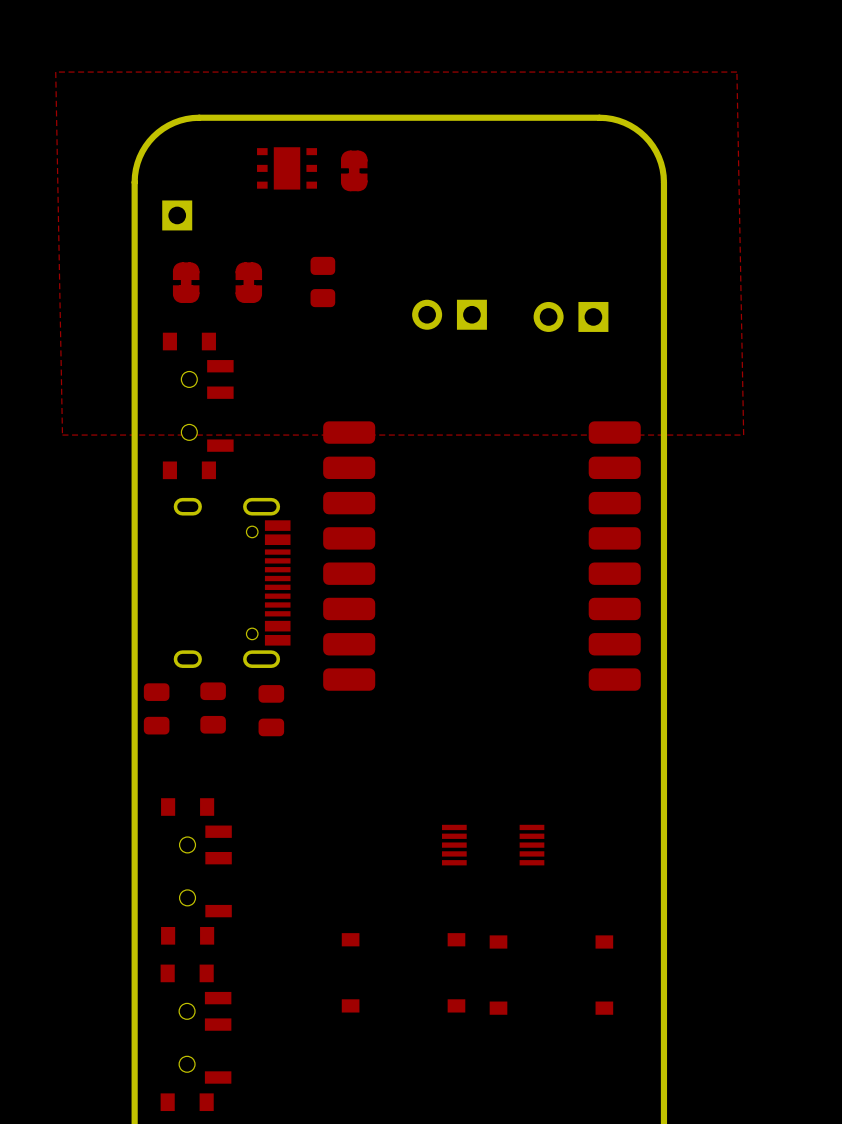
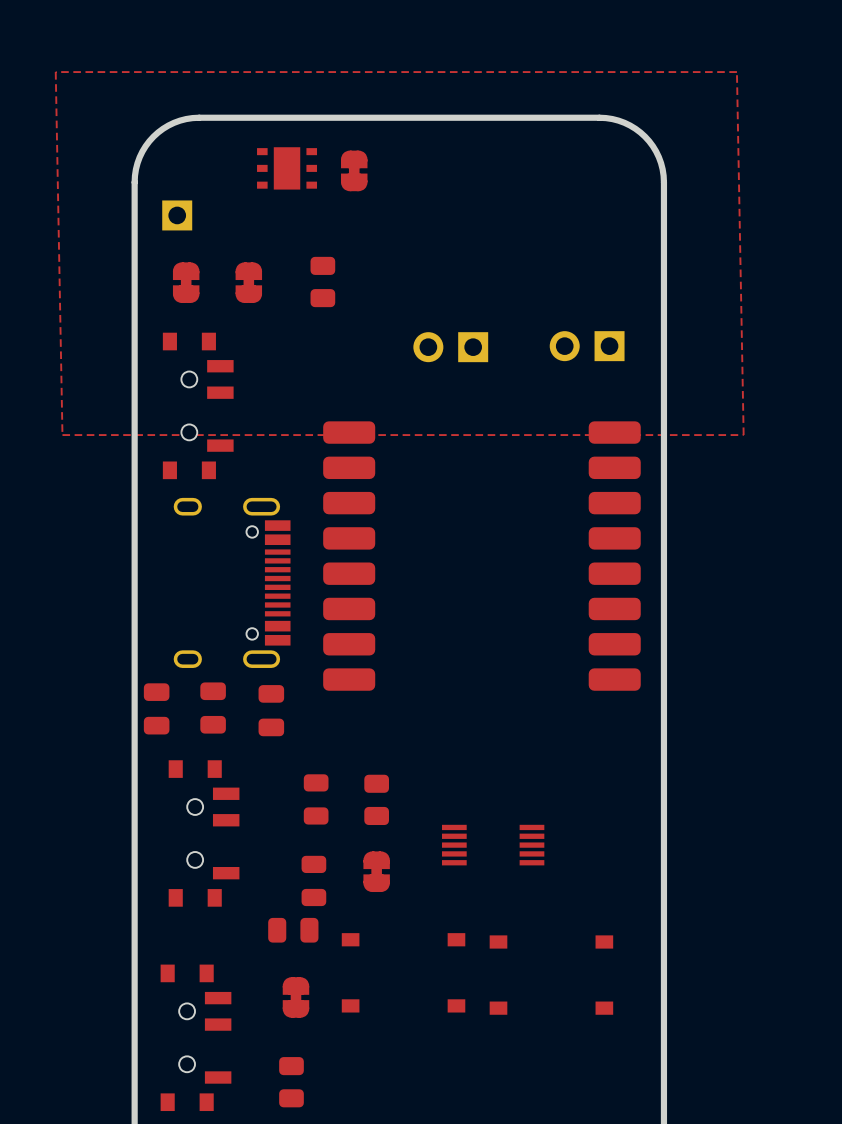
part position: (449, 314) -> (450, 347)
part position: (571, 316) -> (587, 346)
part: none -> (316, 799)
part: none -> (376, 799)
part position: (196, 871) -> (204, 833)
part: none -> (376, 871)
part: none -> (313, 880)
part: none -> (293, 930)
part: none -> (295, 997)
part: none -> (291, 1082)

